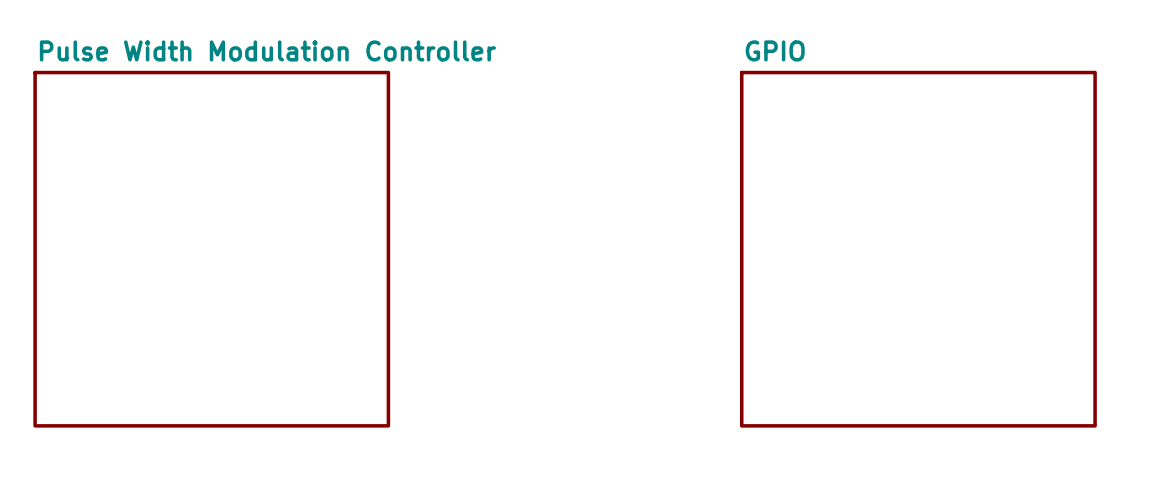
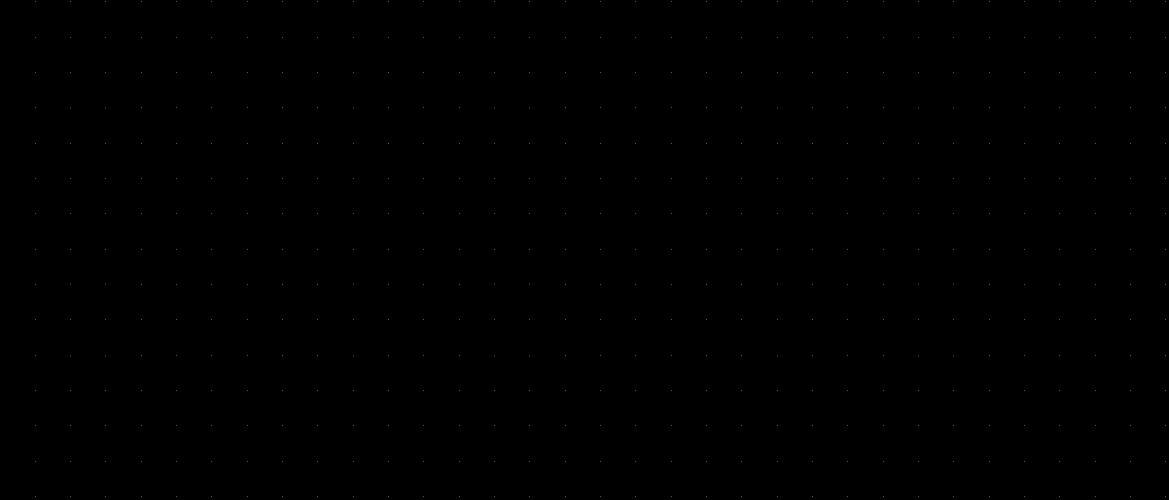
sheet Pulse Width Modulation Controller: (211, 249) -> none
sheet GPIO: (918, 249) -> none

